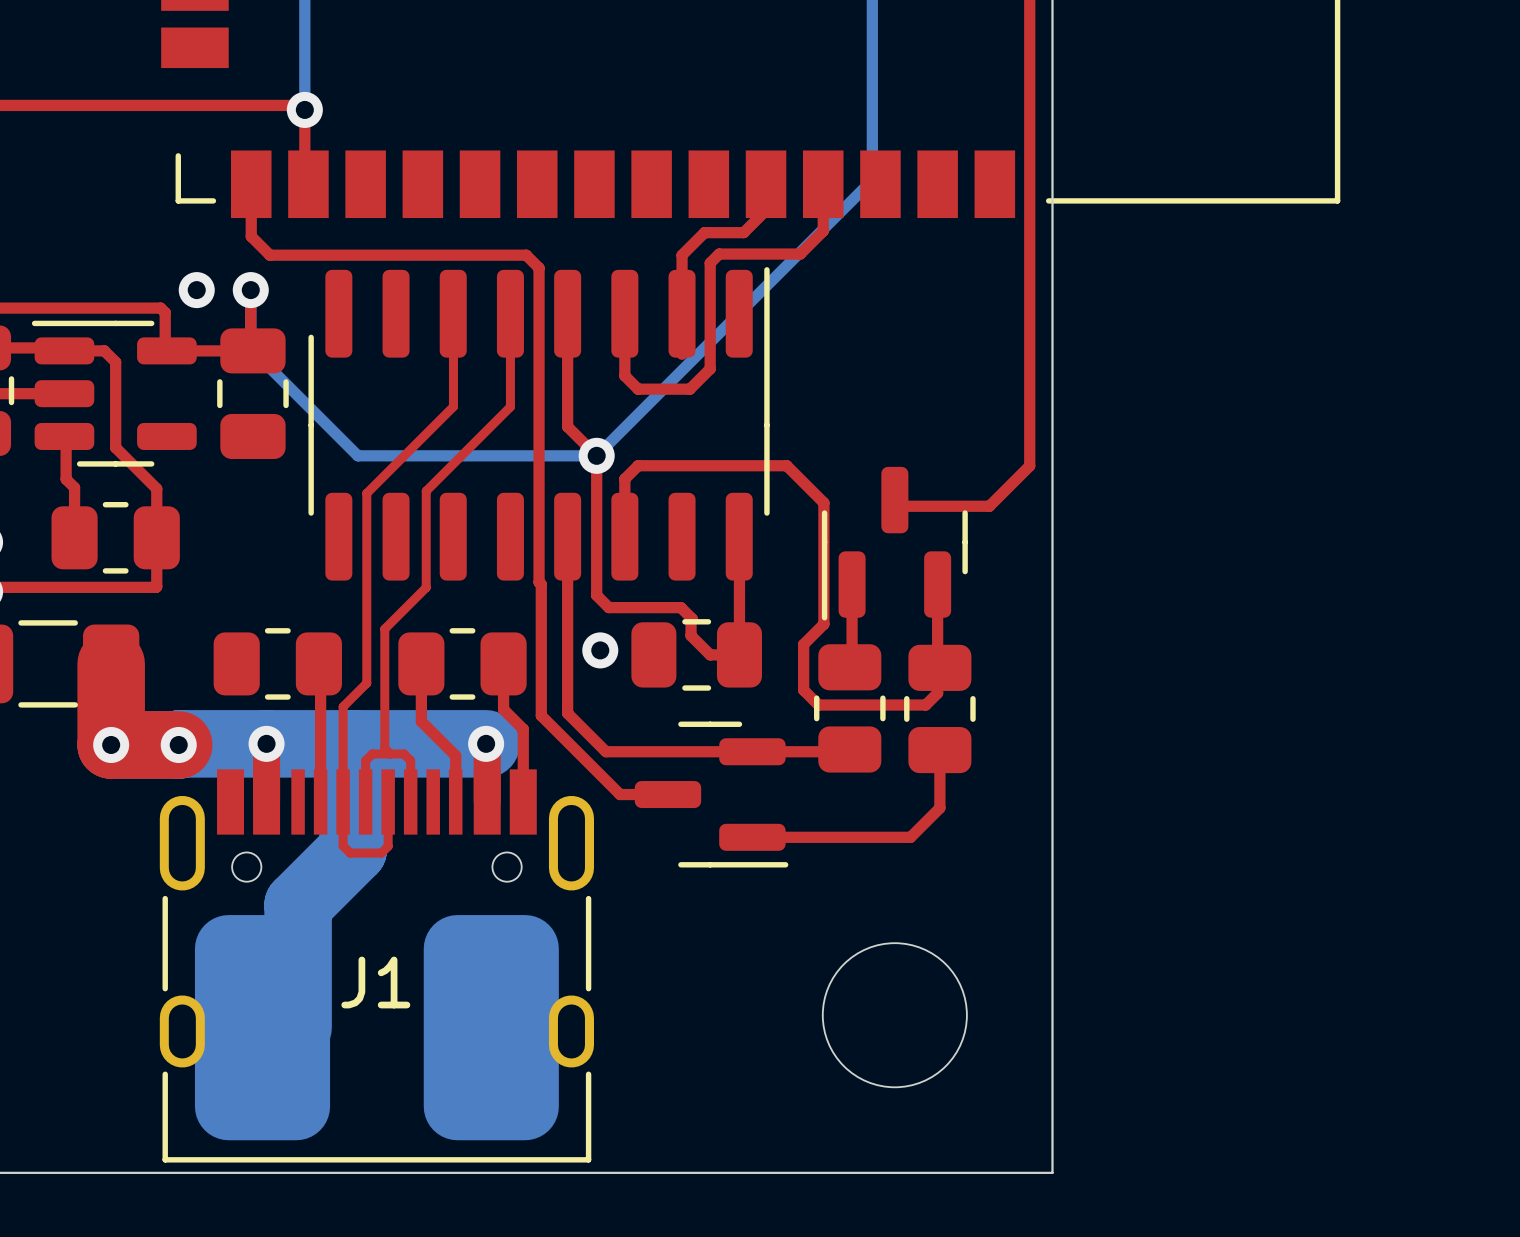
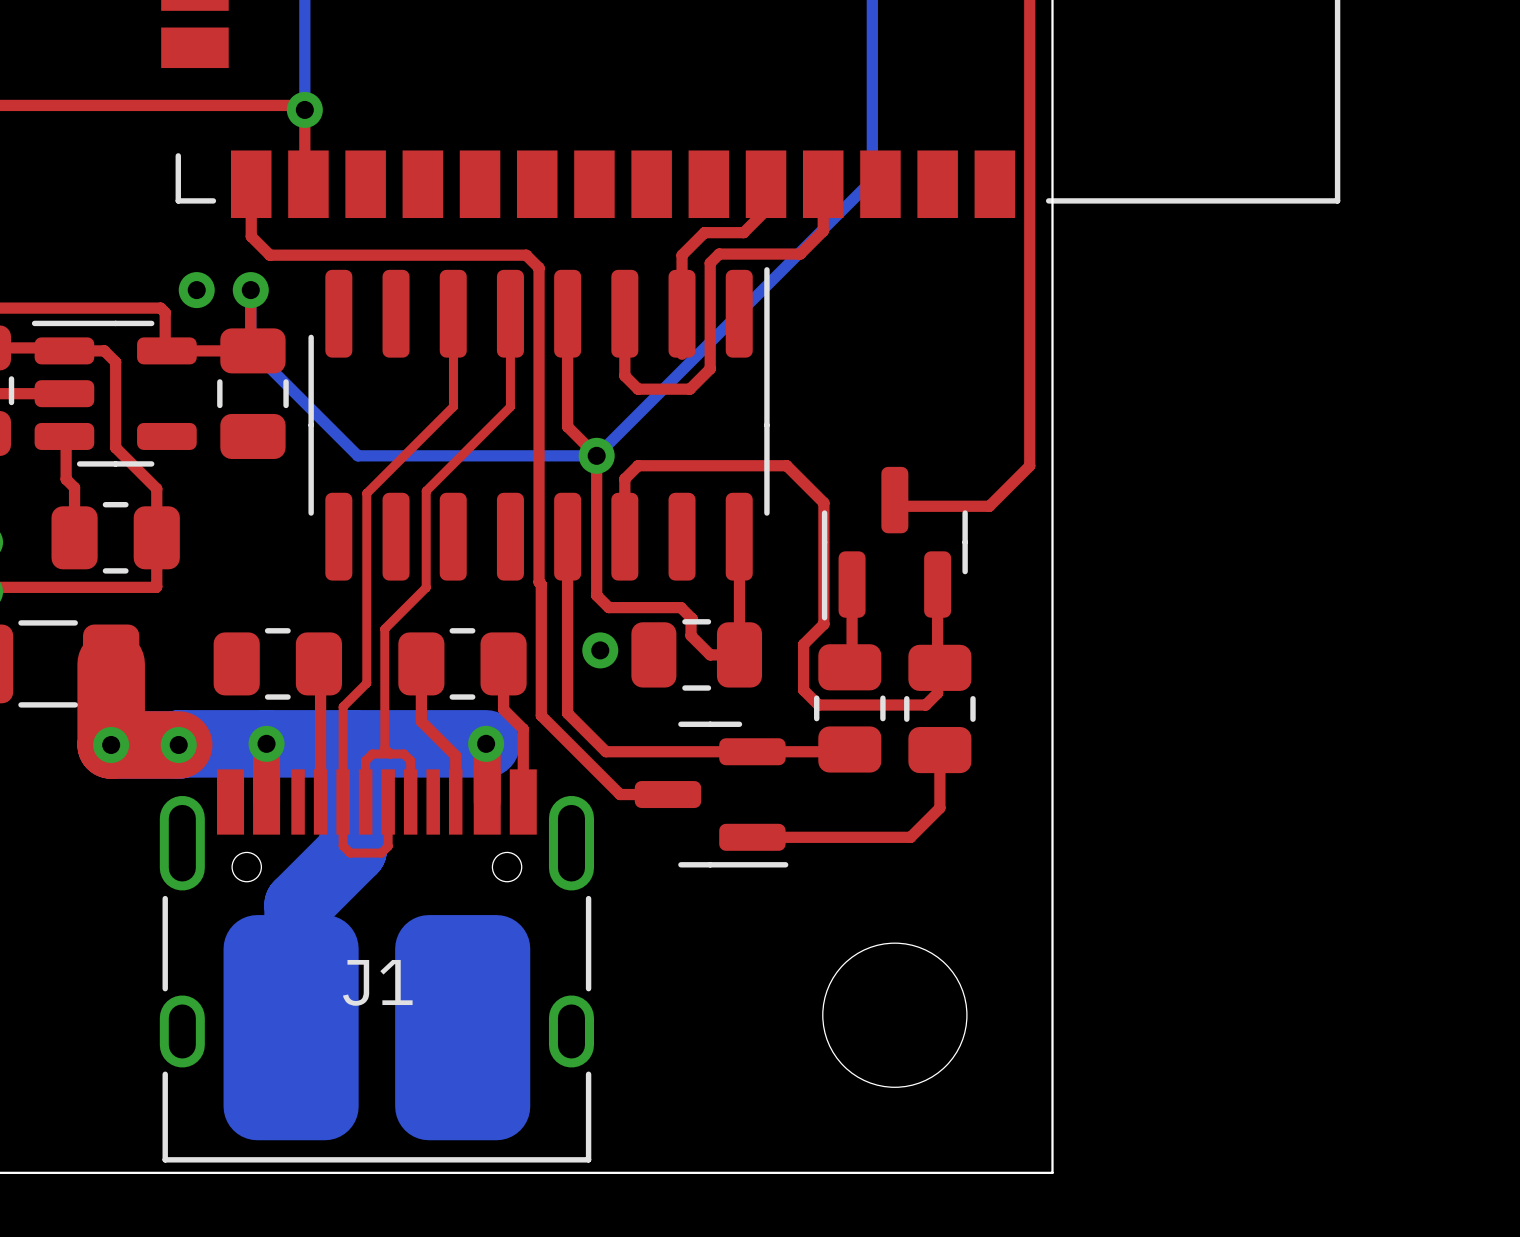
part footprint: [194, 915, 559, 1141] -> [223, 915, 531, 1141]

